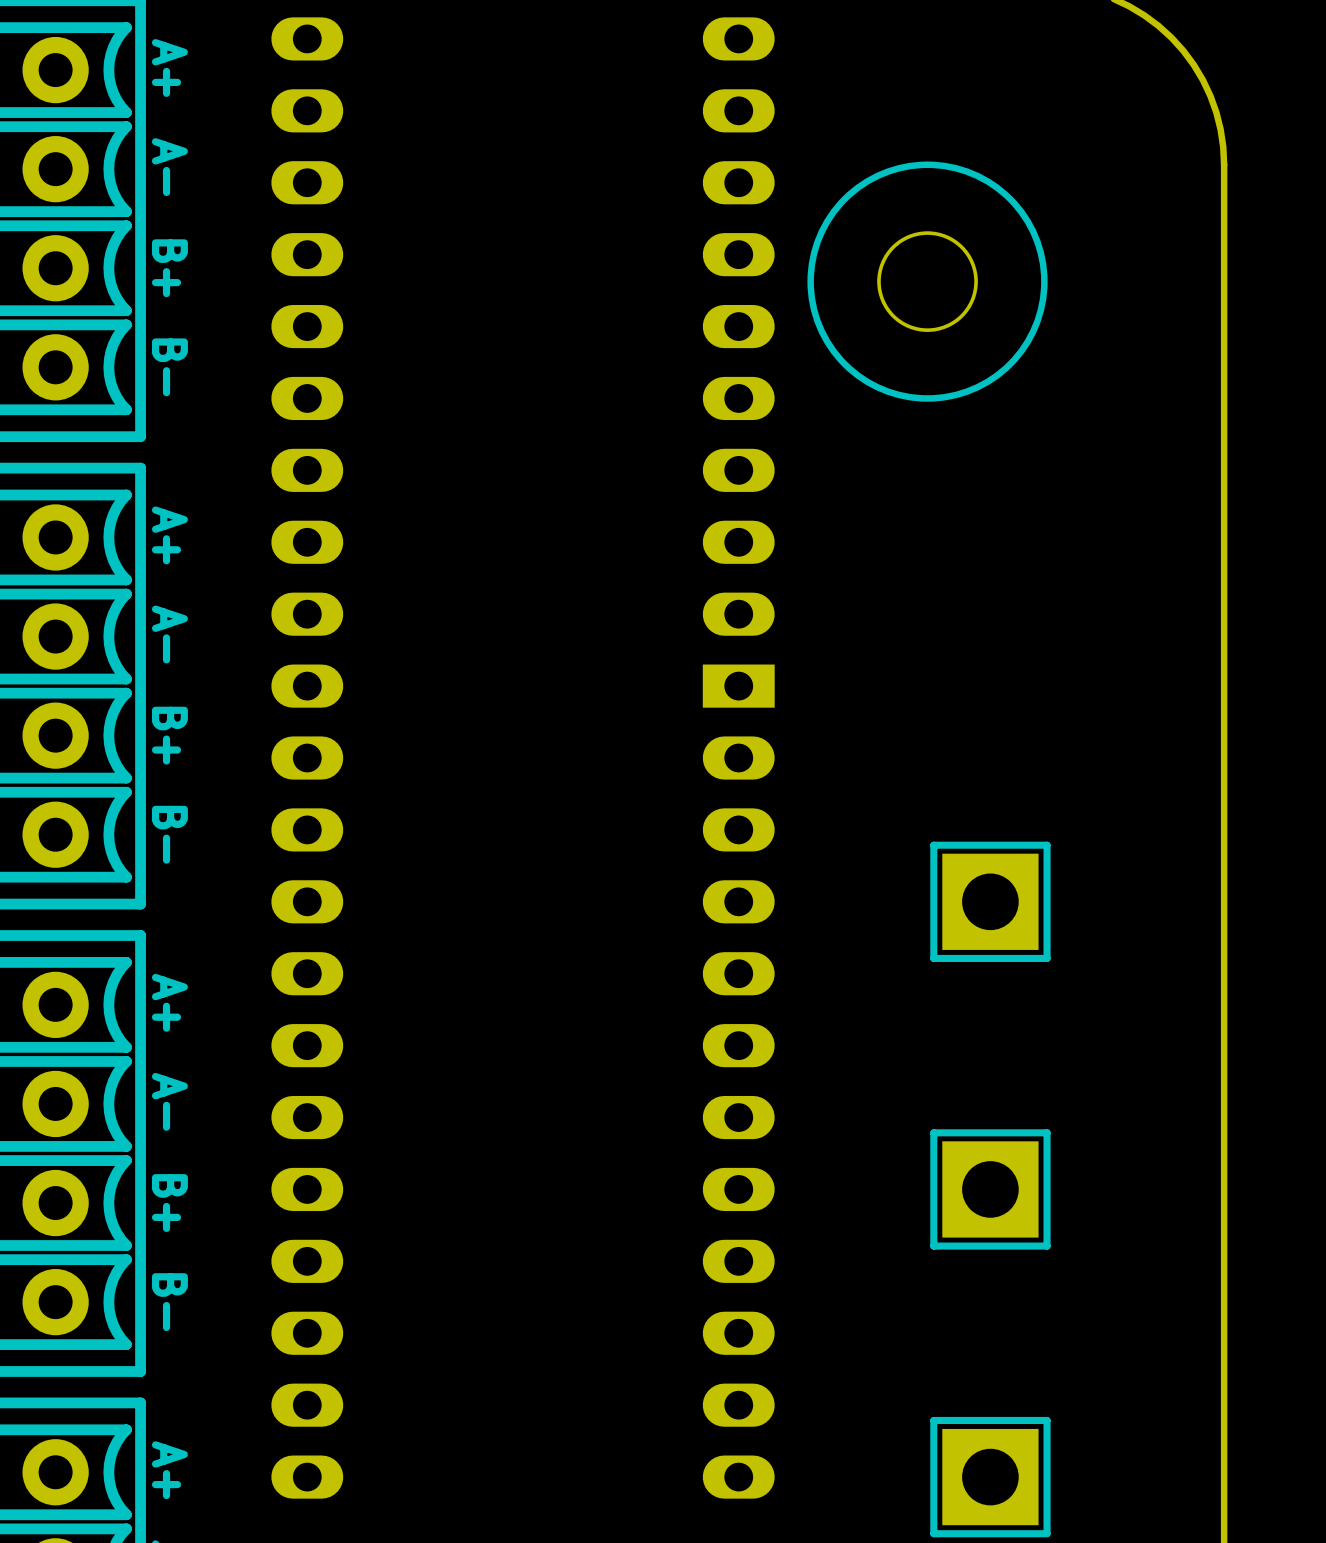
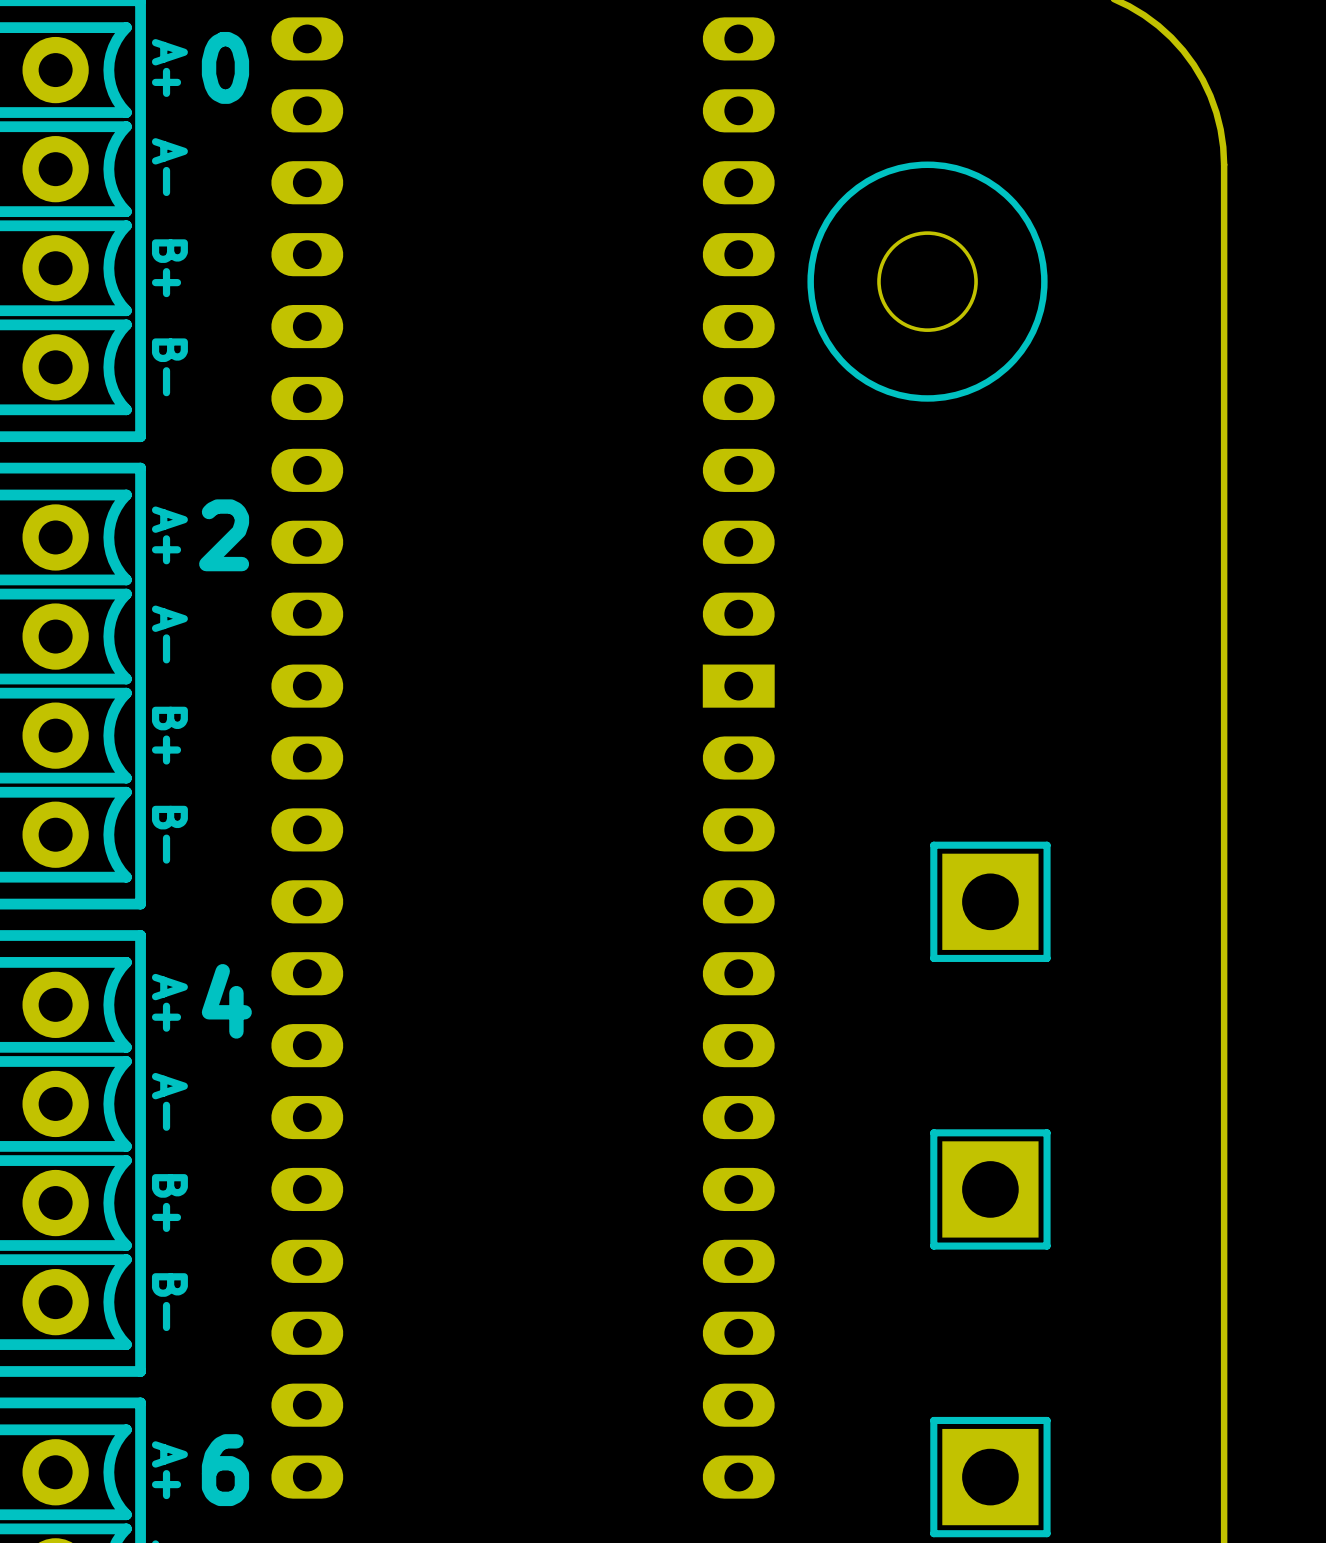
part text: none -> 0 (225, 67)
part text: none -> 2 (224, 535)
part text: none -> 4 (226, 1001)
part text: none -> 6 (225, 1470)

